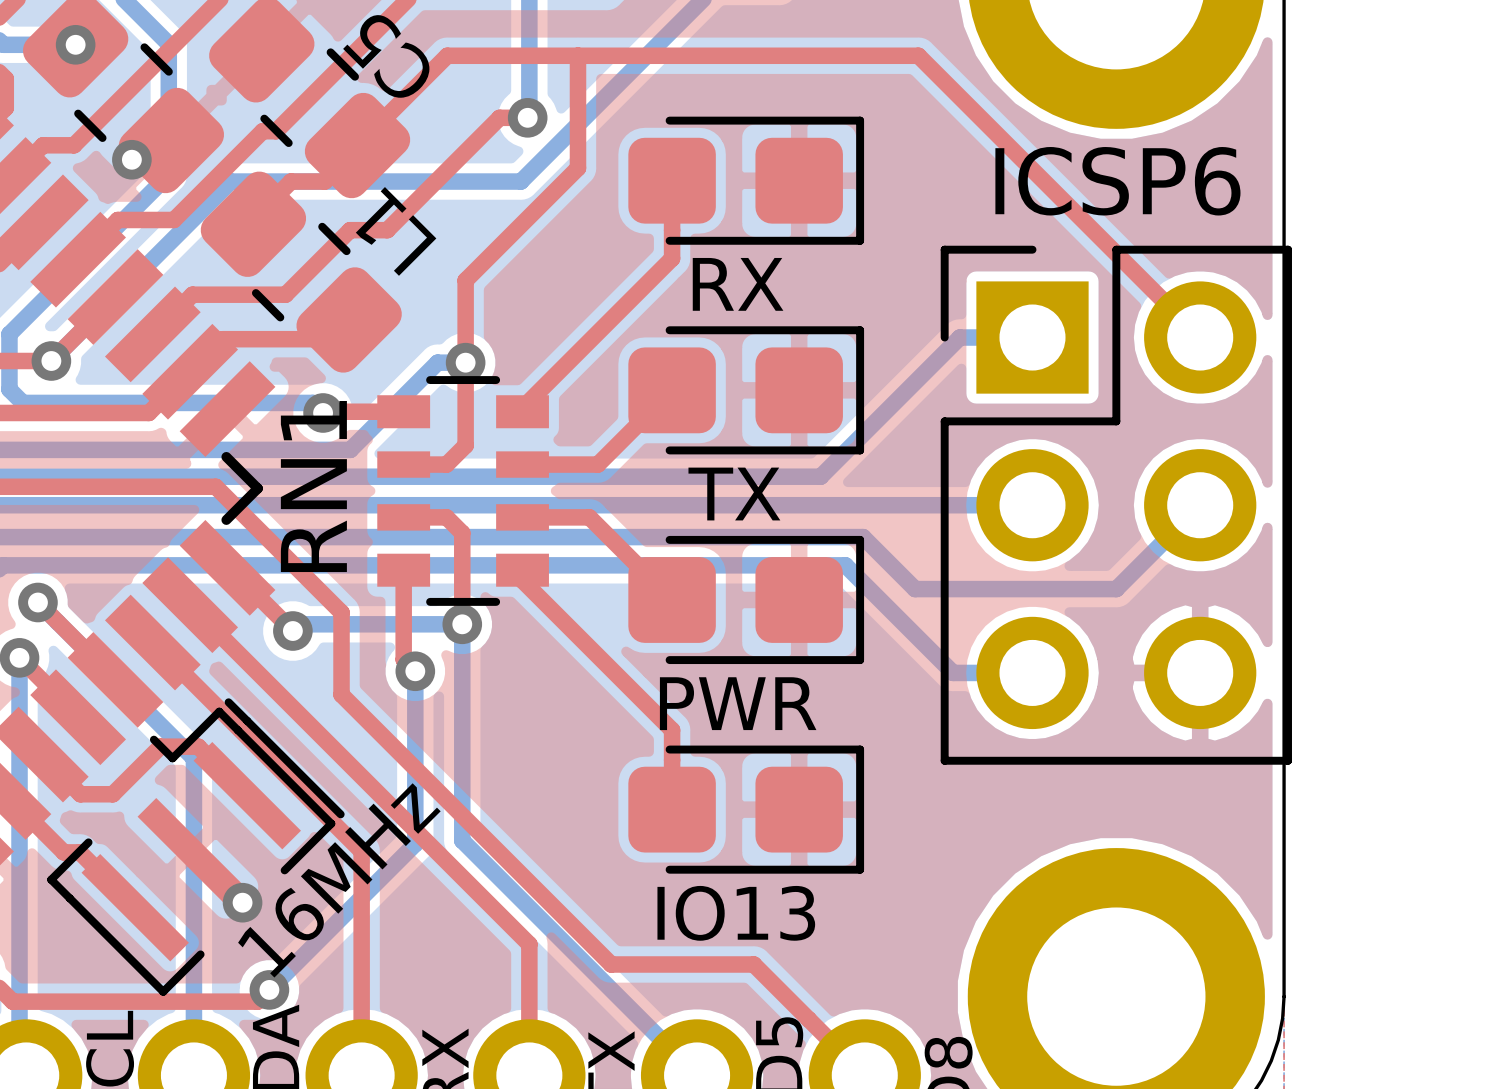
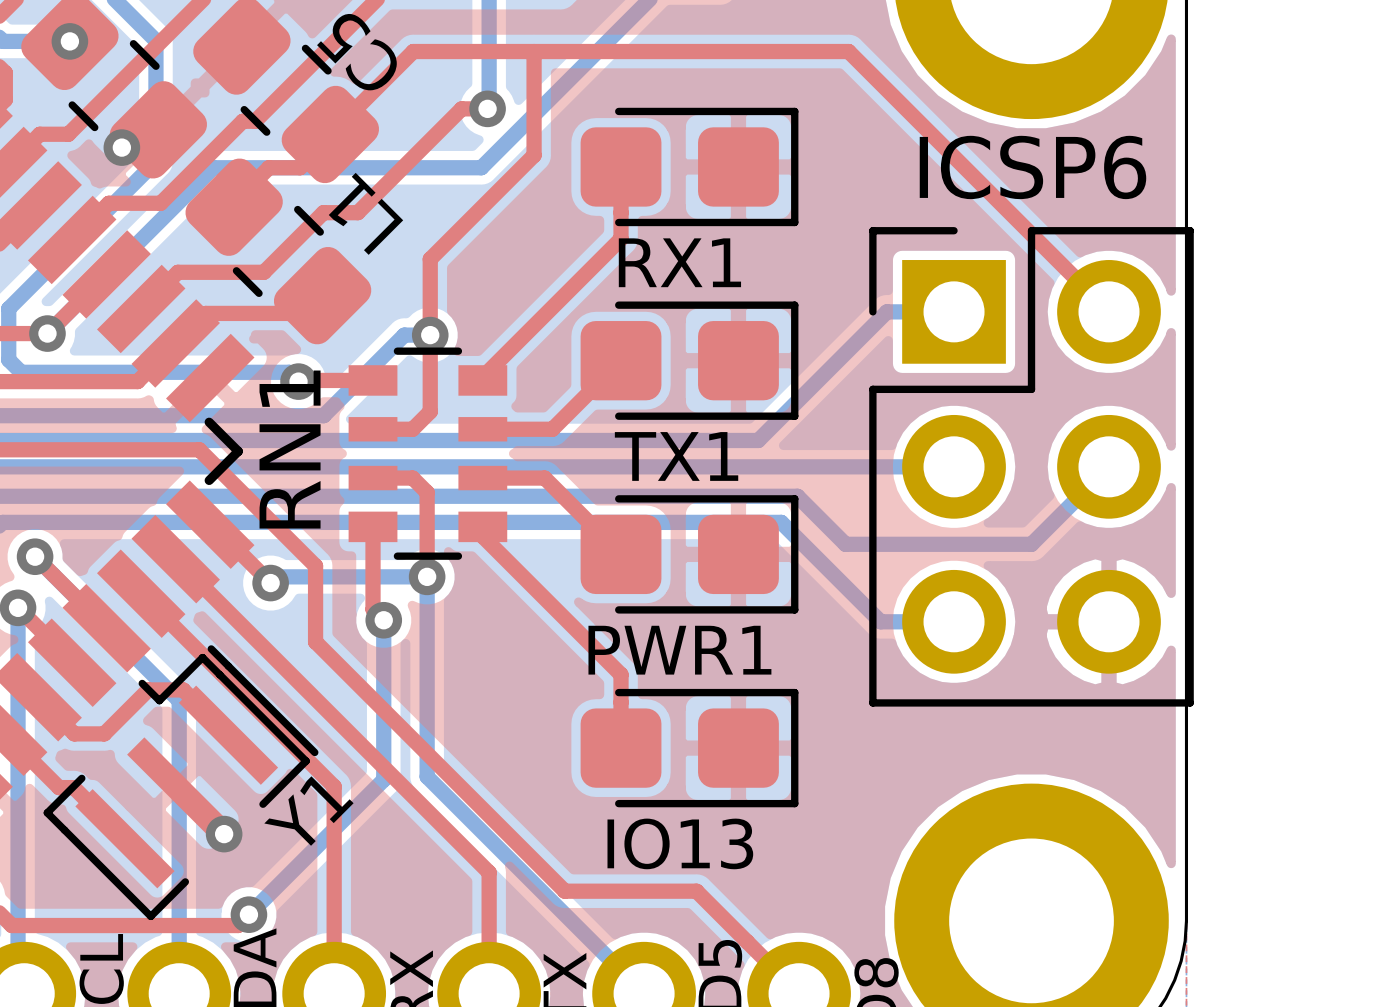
RX name: RX (738, 284) -> RX1 (679, 262)
TX name: TX (734, 494) -> TX1 (676, 456)
PWR name: PWR (738, 703) -> PWR1 (679, 650)
16MHz name: 16MHz (339, 880) -> Y1 (308, 811)

